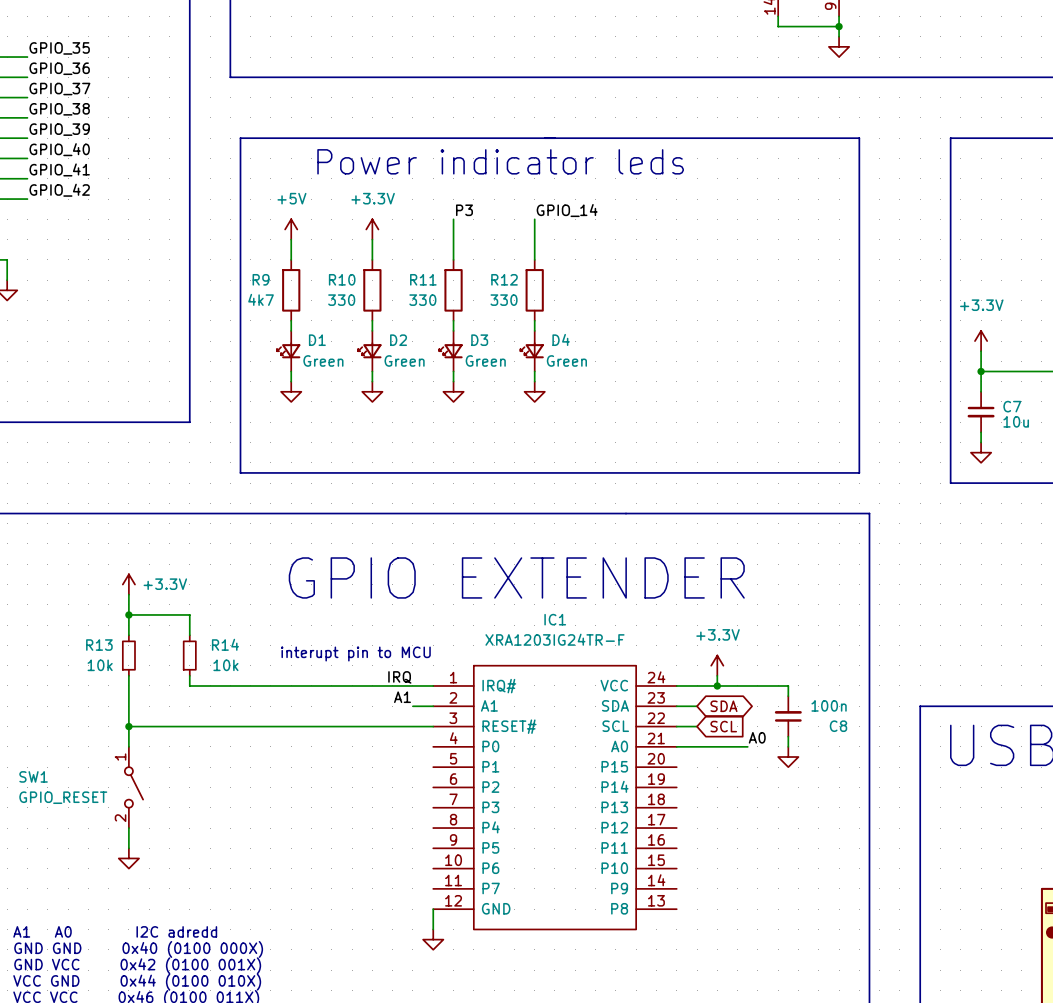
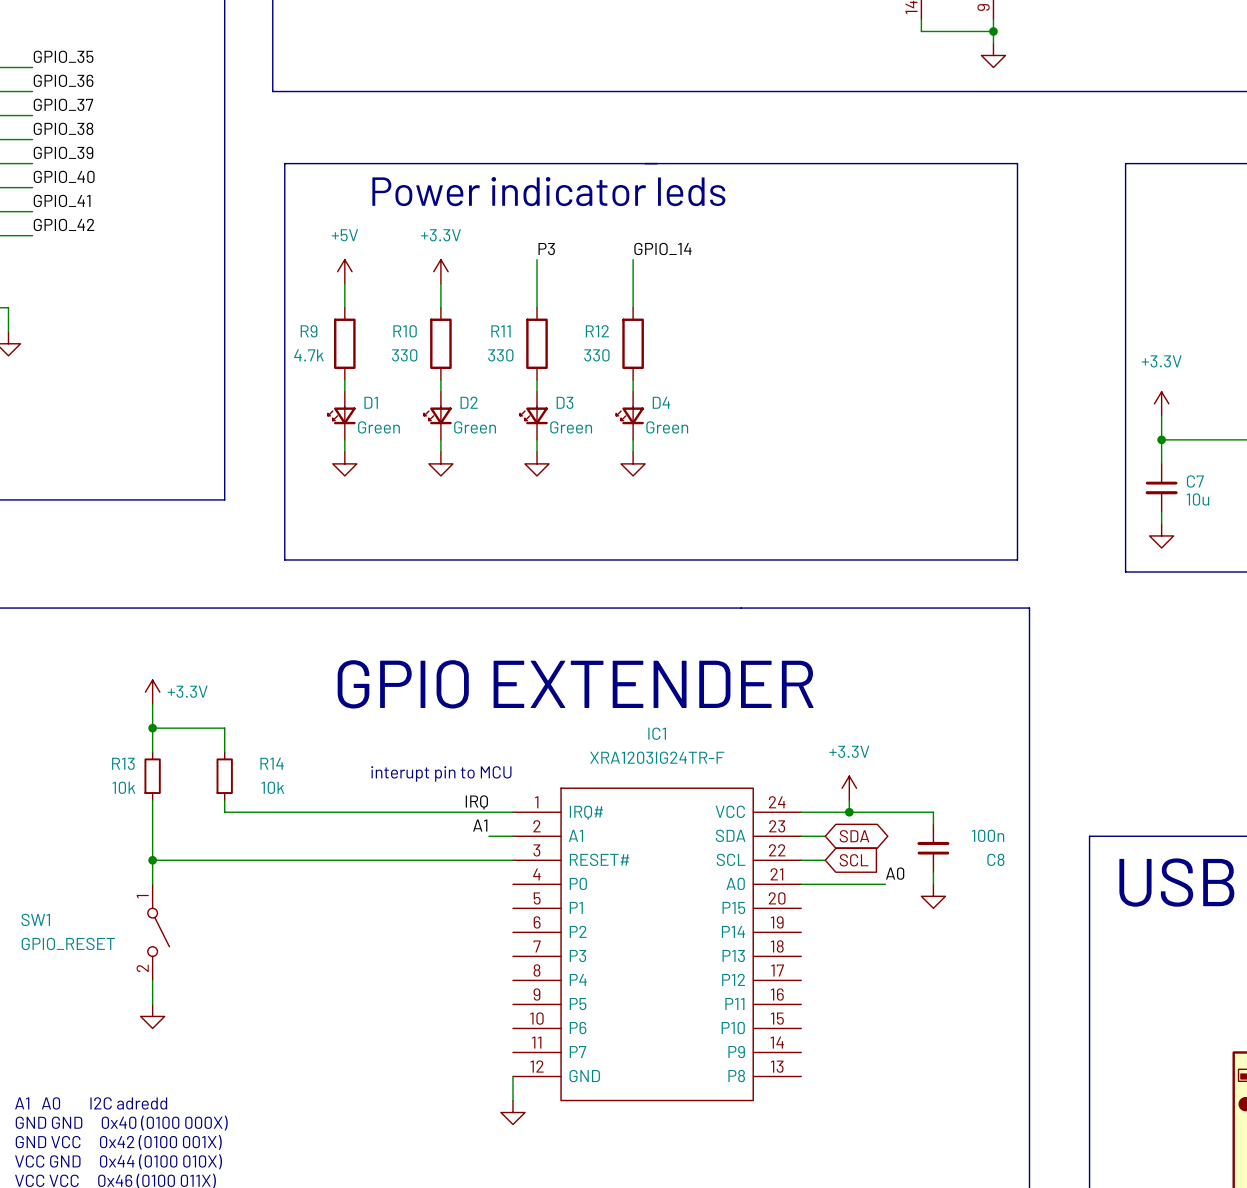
R9 value: 4k7 (261, 299) -> 4.7k (308, 355)

